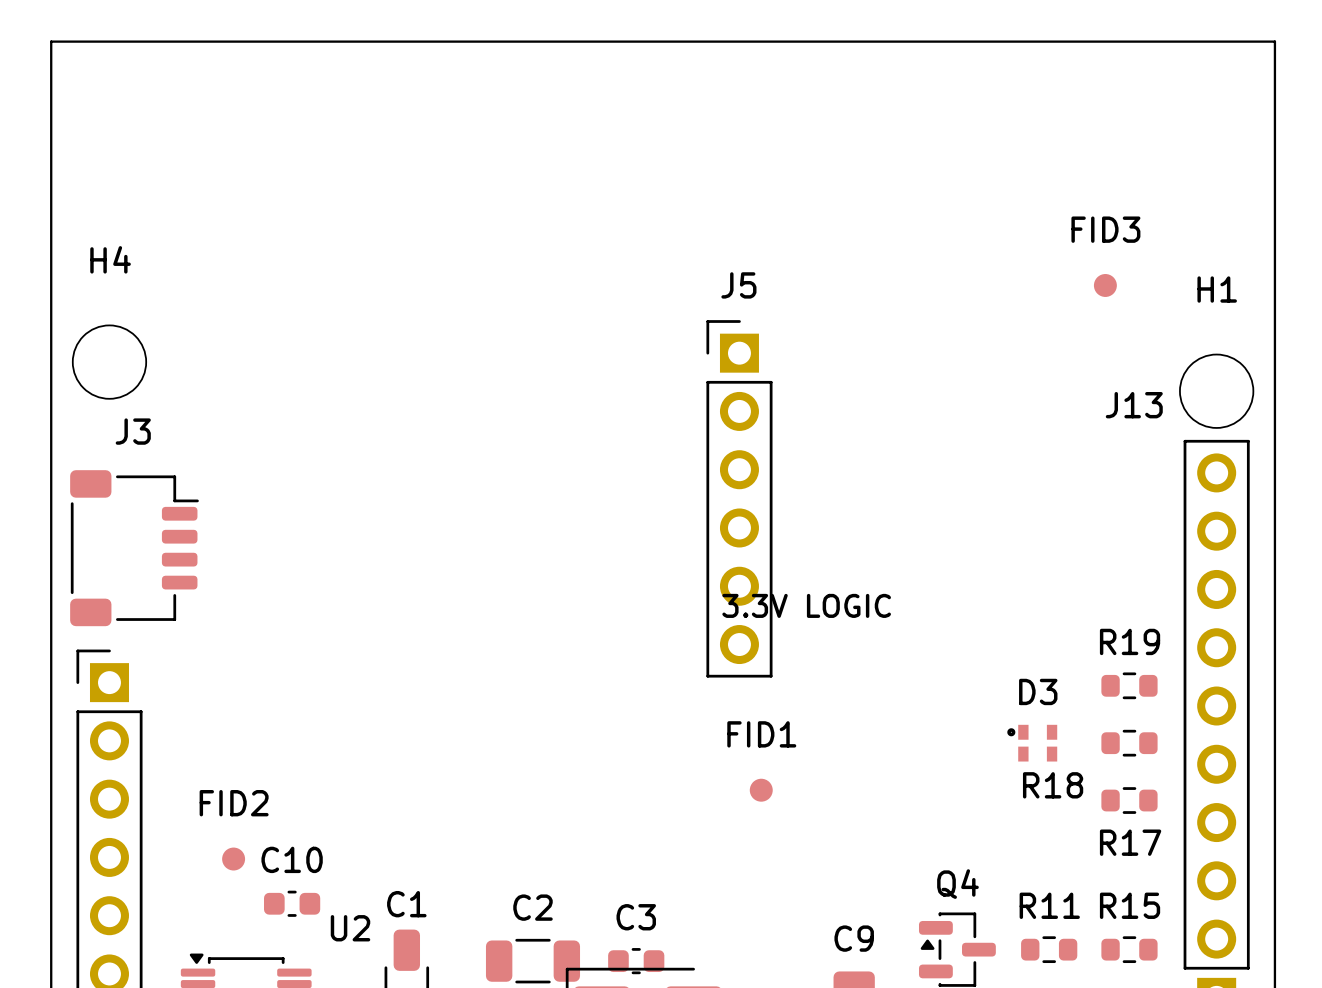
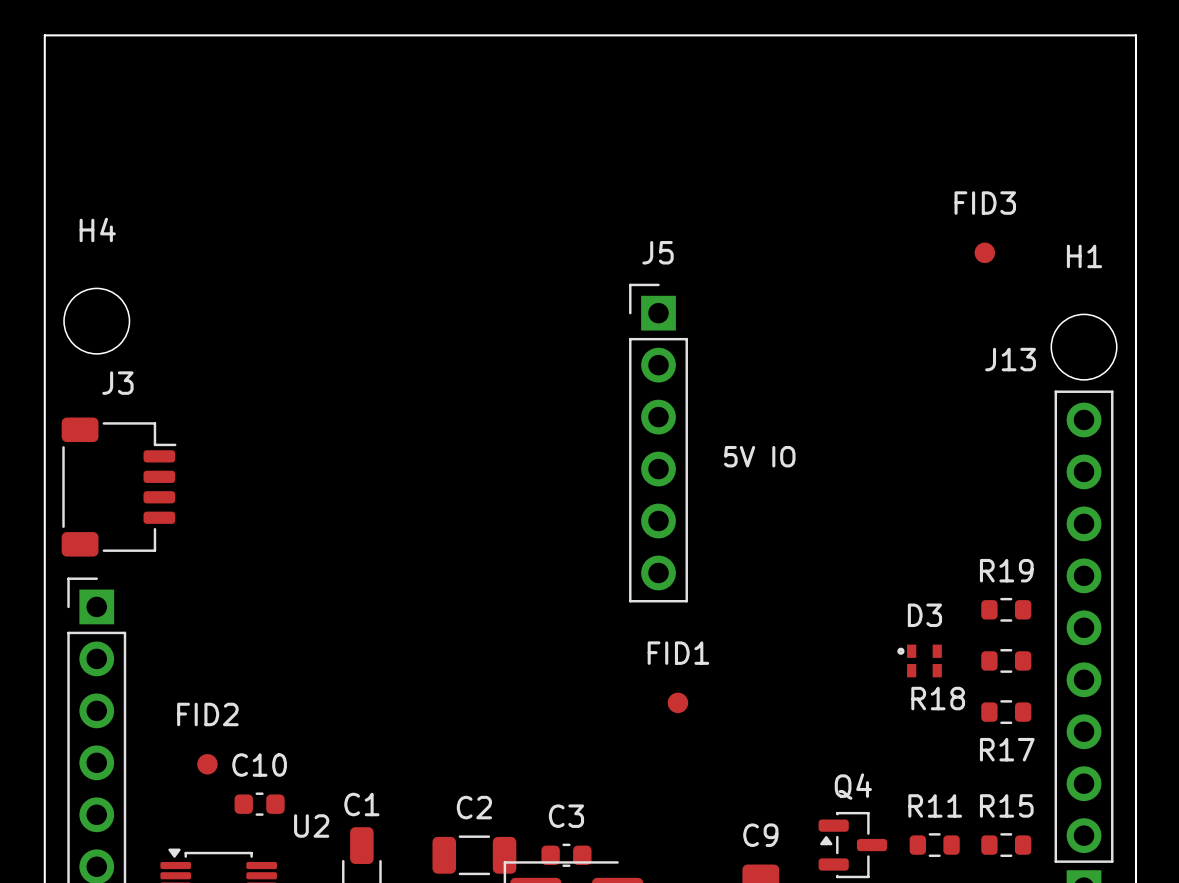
text: none -> 5V IO (759, 456)
text: 3.3V LOGIC (806, 605) -> none

